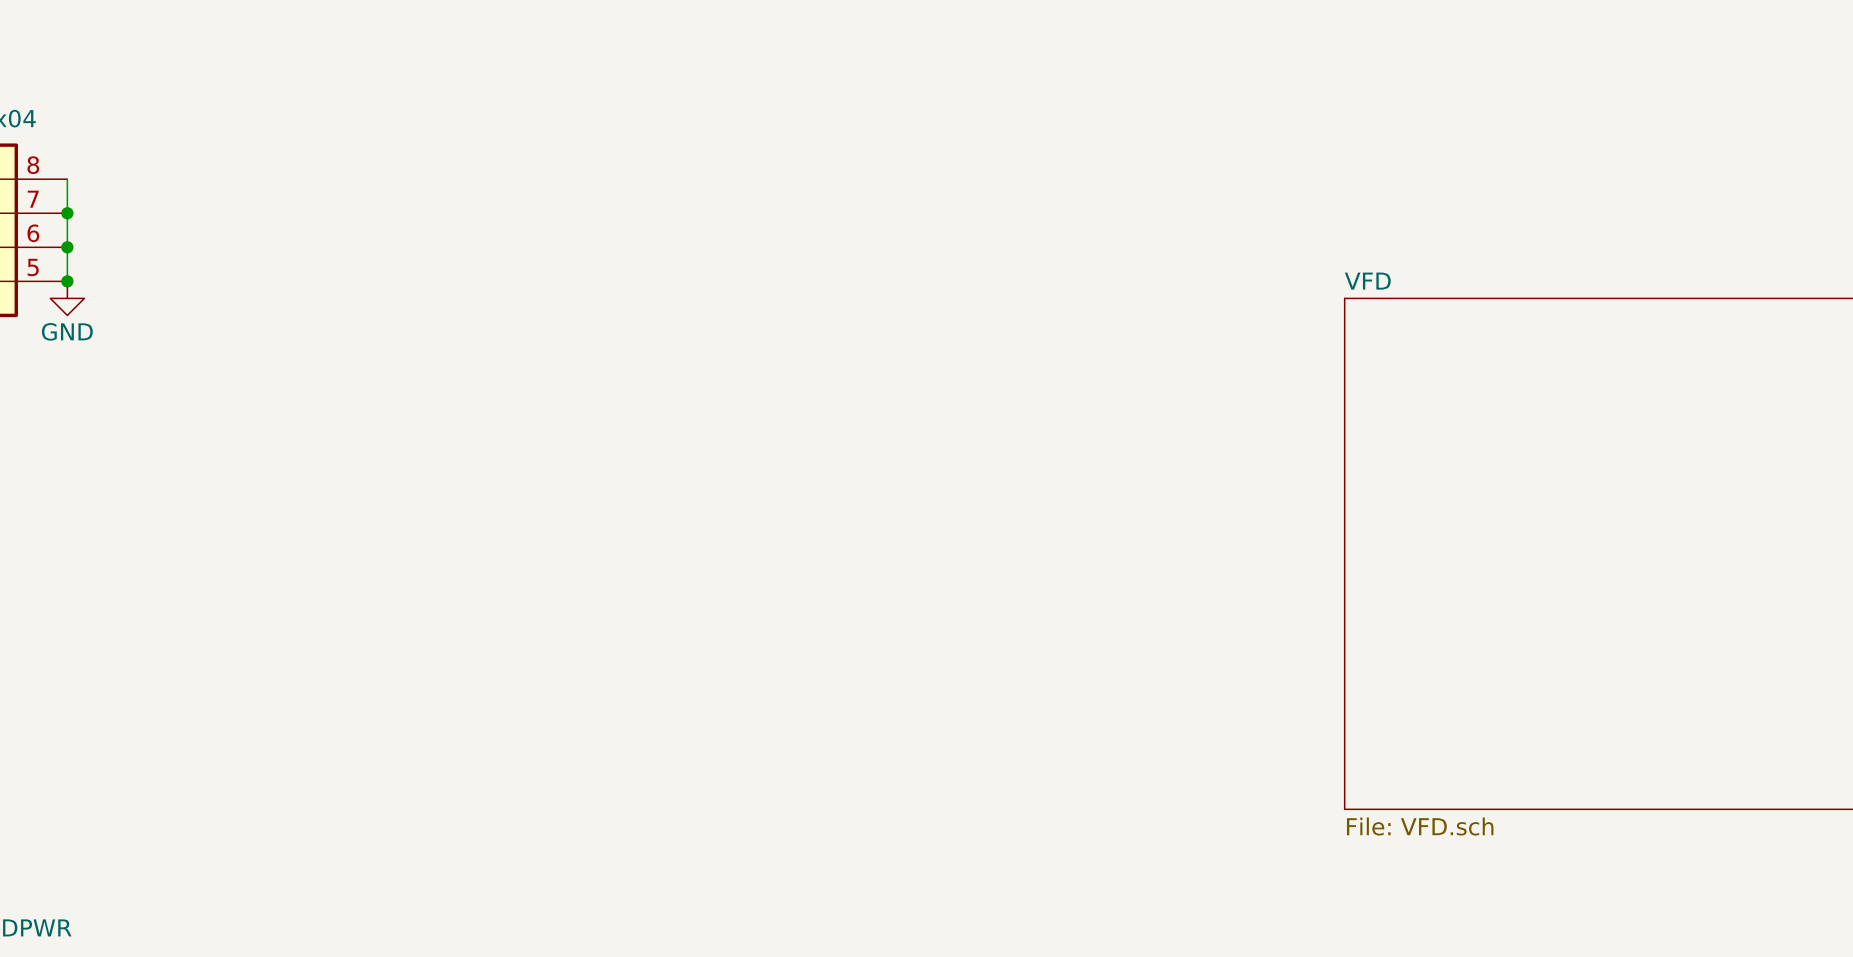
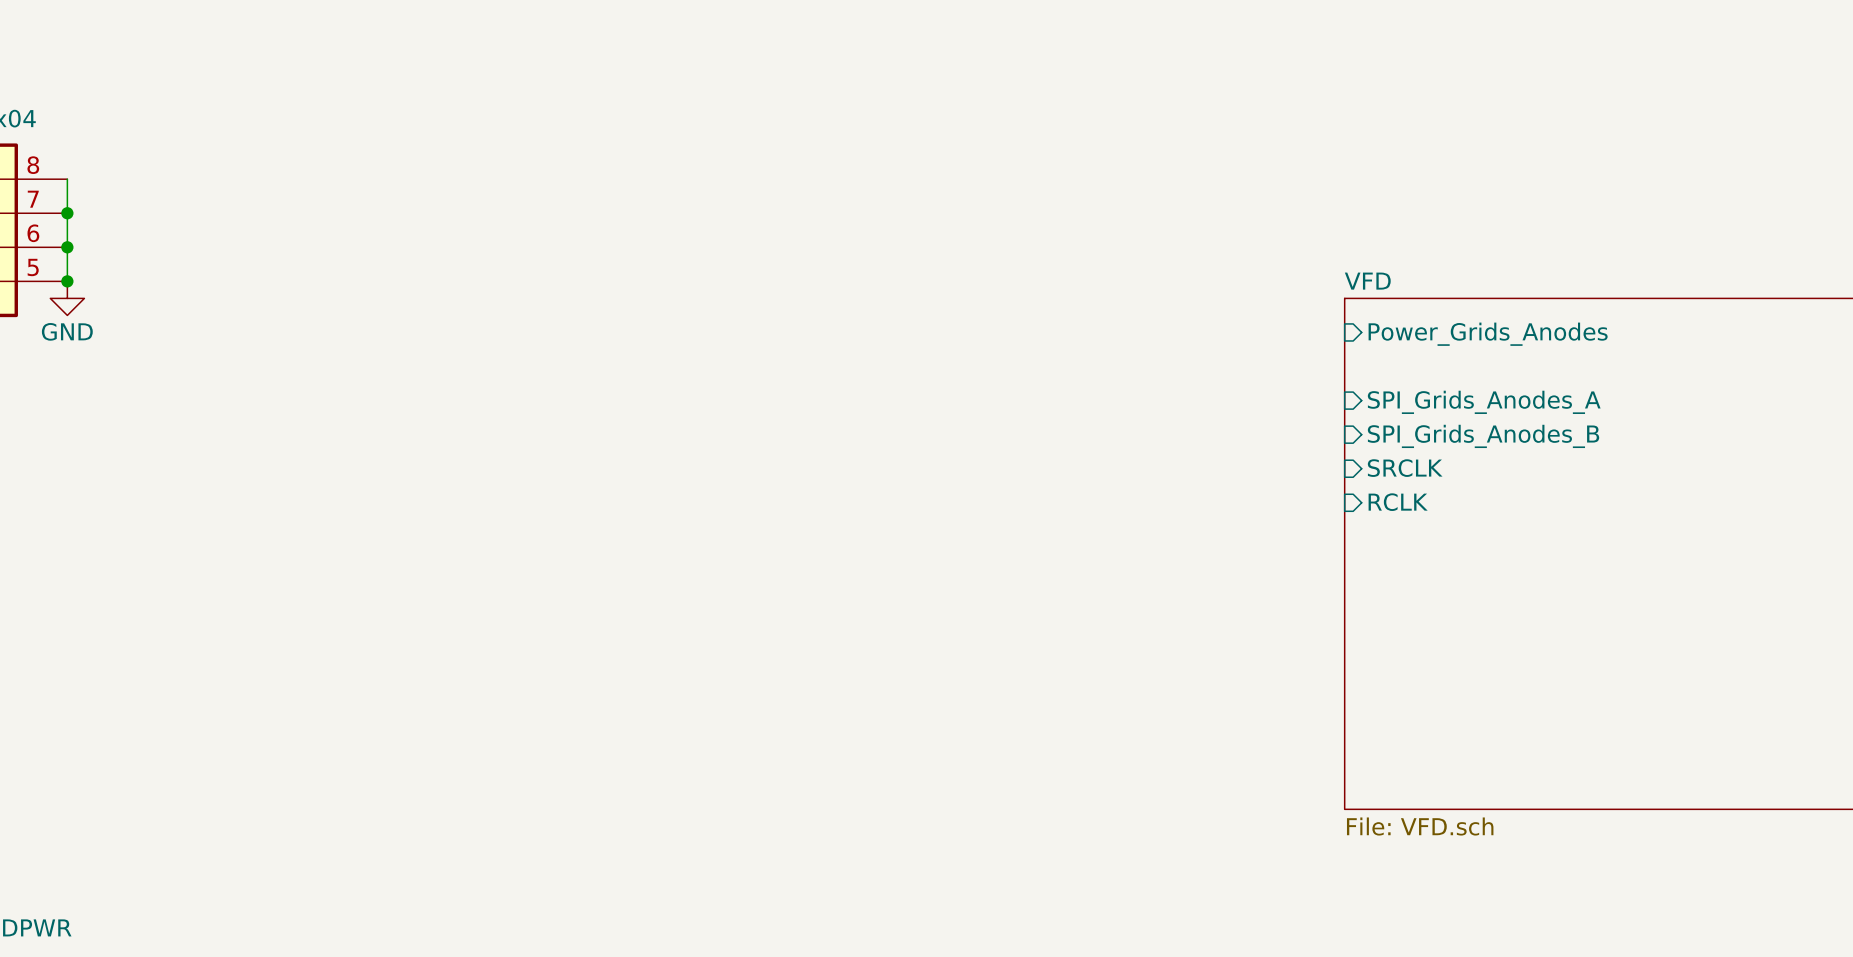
sheet pin: none -> Power_Grids_Anodes (1488, 334)
sheet pin: none -> SPI_Grids_Anodes_A (1484, 402)
sheet pin: none -> SPI_Grids_Anodes_B (1483, 436)
sheet pin: none -> SRCLK (1405, 468)
sheet pin: none -> RCLK (1398, 502)

